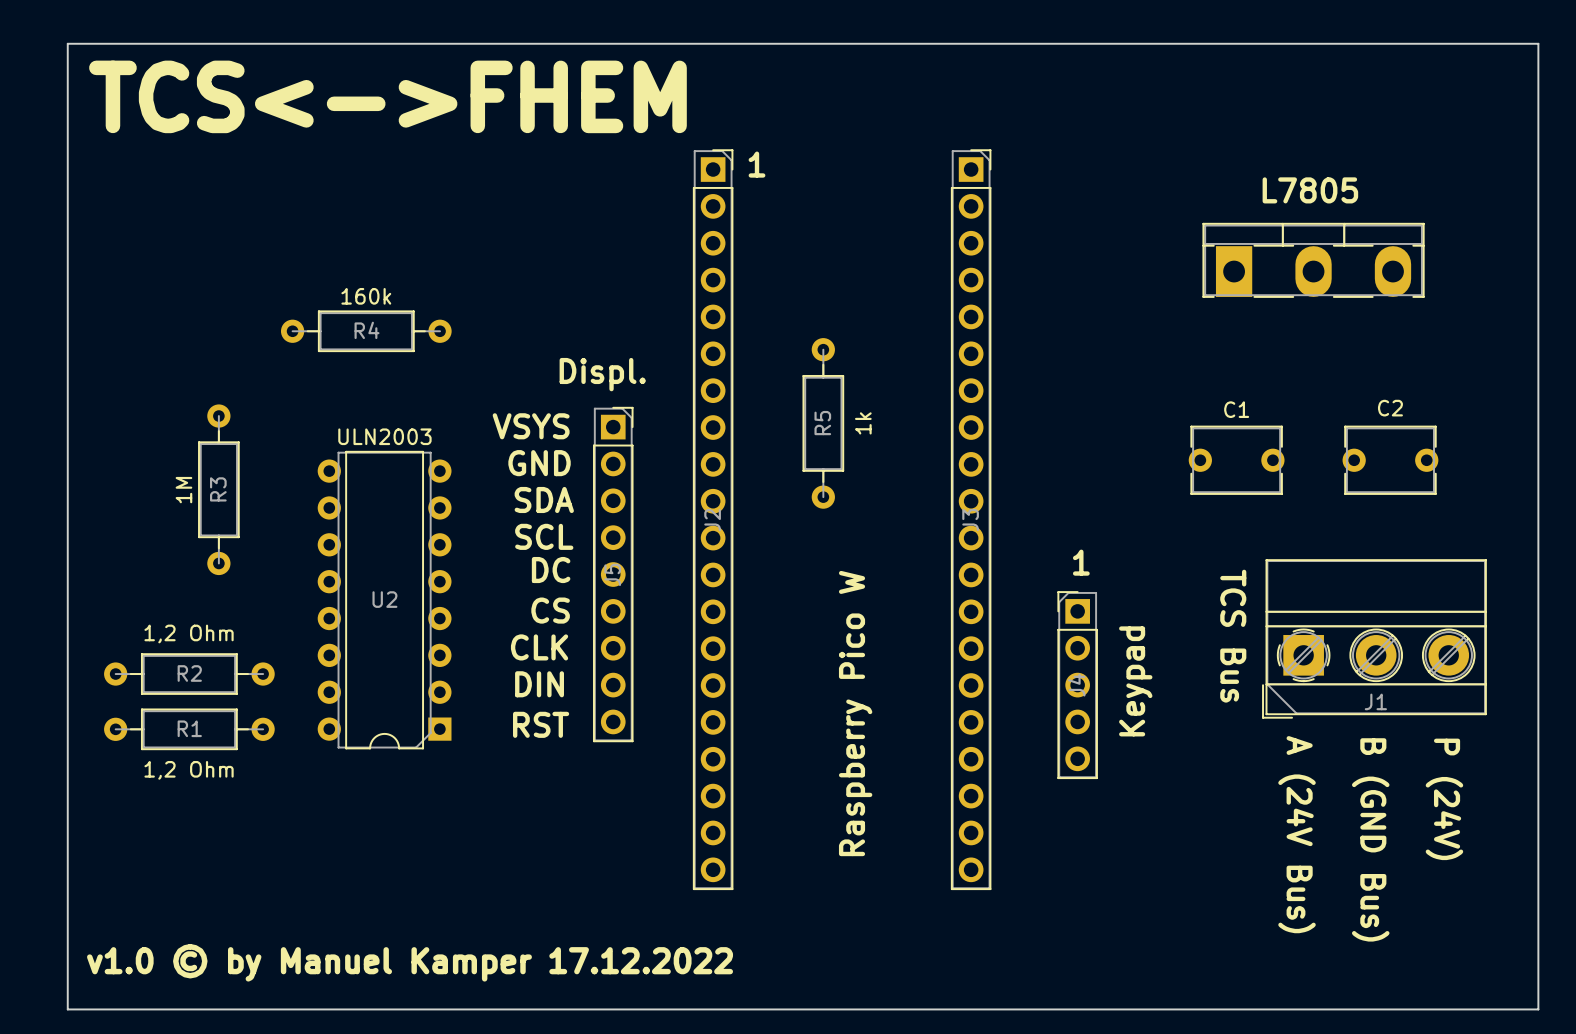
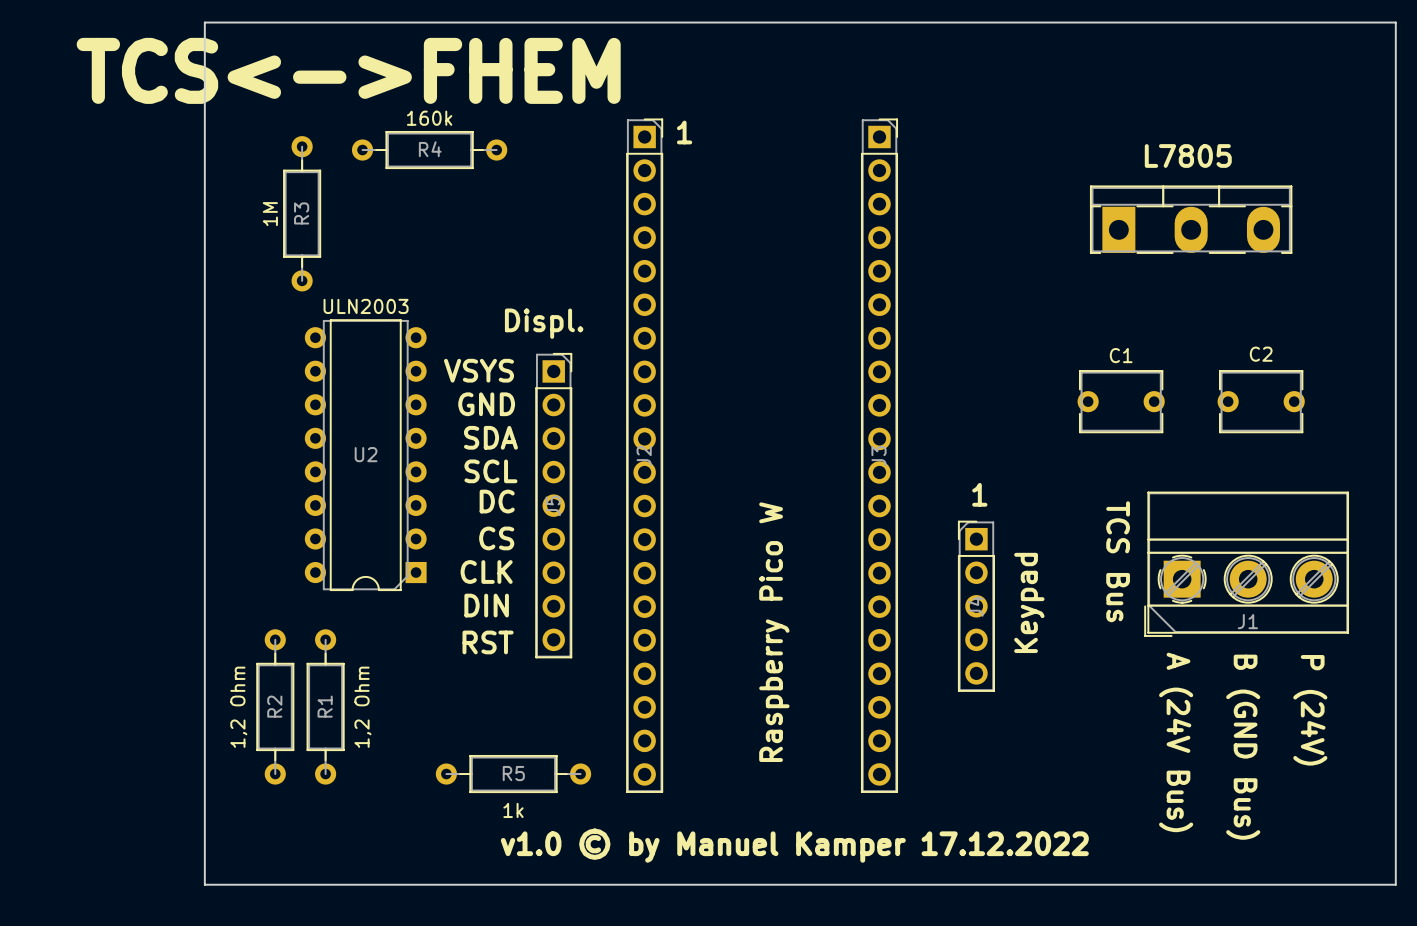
board edge: (229, 43) (67, 43) (67, 1009) (1538, 1009) (1538, 991) -> (204, 22) (204, 884) (1395, 884)
R4 position: (366, 331) -> (429, 150)
R5 rotation: 0° (823, 423) -> 90° clockwise (513, 774)
R5 position: (823, 423) -> (513, 774)
R3 position: (218, 489) -> (302, 213)
U2 position: (384, 600) -> (365, 455)
R2 value position: 1,2 Ohm (189, 633) -> 1,2 Ohm (238, 707)
R2 rotation: 0° (189, 674) -> 90° clockwise (275, 706)
R2 position: (189, 674) -> (275, 706)
R1 rotation: 0° (189, 729) -> 90° clockwise (325, 706)
R1 position: (189, 729) -> (325, 706)
R1 value position: 1,2 Ohm (189, 770) -> 1,2 Ohm (362, 707)
text: none -> v1.0 © by Manuel Kamper 17.12.2022 (794, 845)
text: v1.0 © by Manuel Kamper 17.12.2022 (410, 962) -> none

